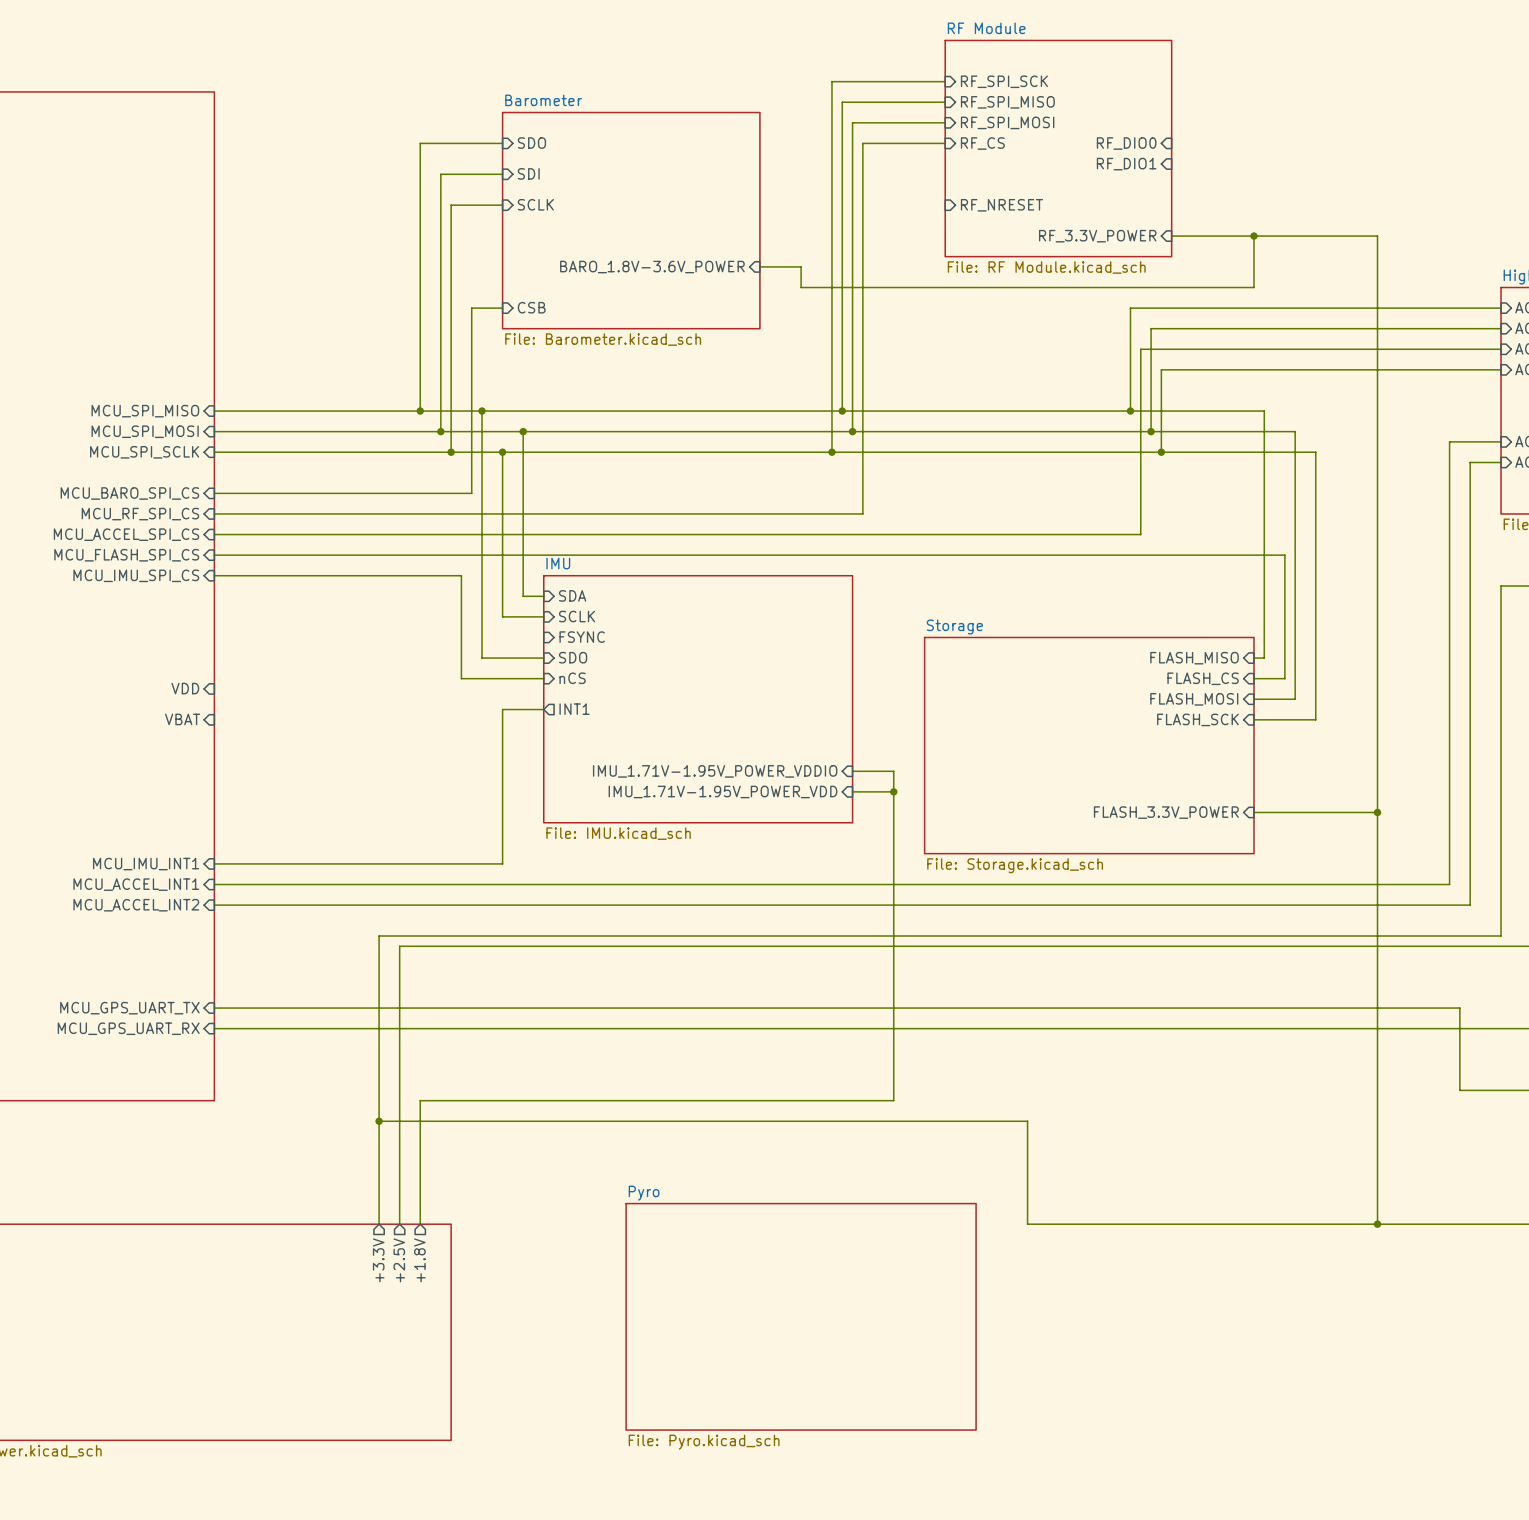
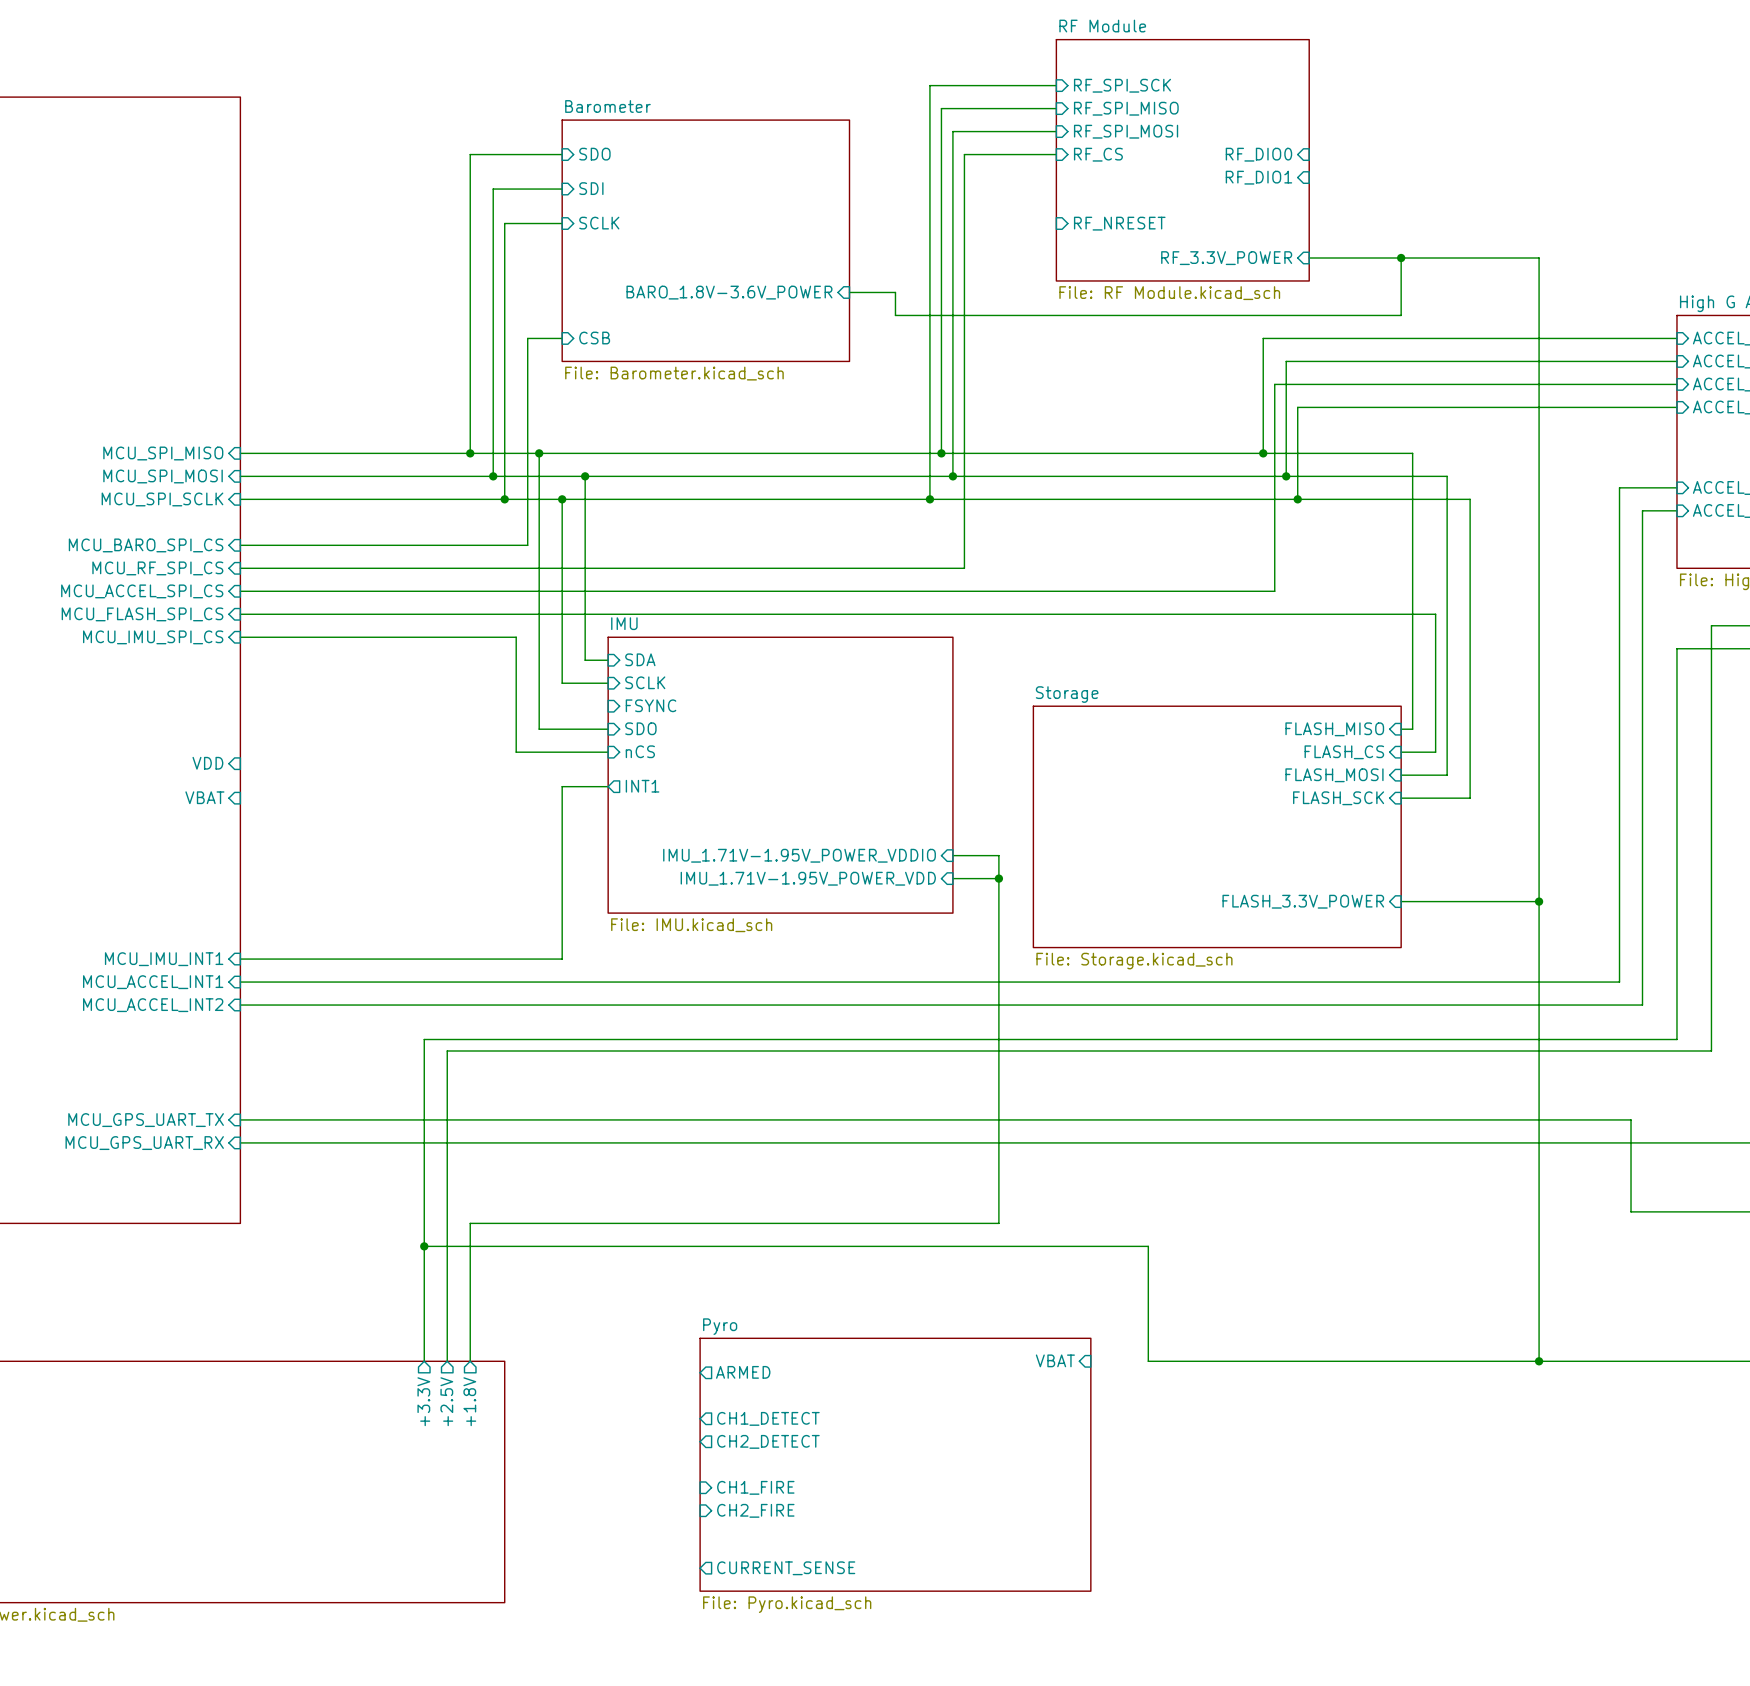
sheet pin: none -> VBAT (1055, 1360)
sheet pin: none -> ARMED (743, 1372)
sheet pin: none -> CH1_DETECT (768, 1418)
sheet pin: none -> CH2_DETECT (768, 1441)
sheet pin: none -> CH1_FIRE (755, 1487)
sheet pin: none -> CH2_FIRE (755, 1510)
sheet pin: none -> CURRENT_SENSE (786, 1568)

